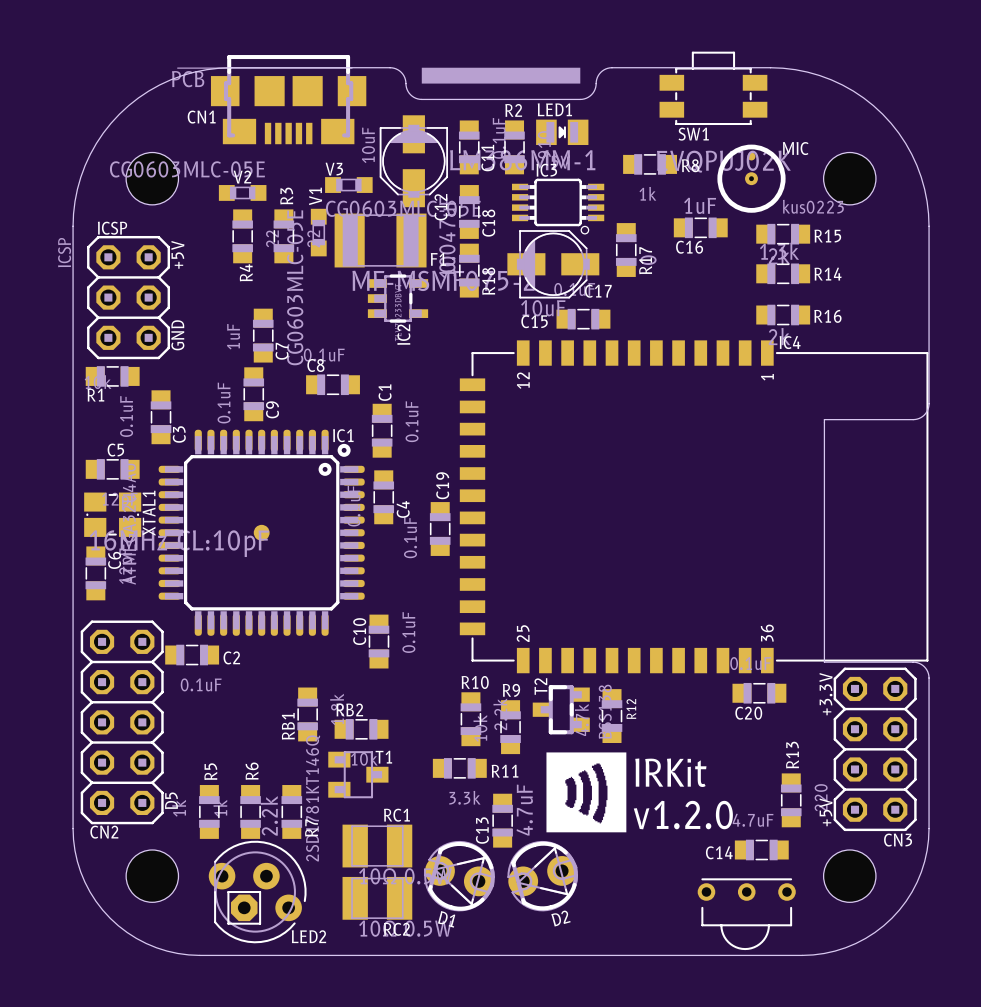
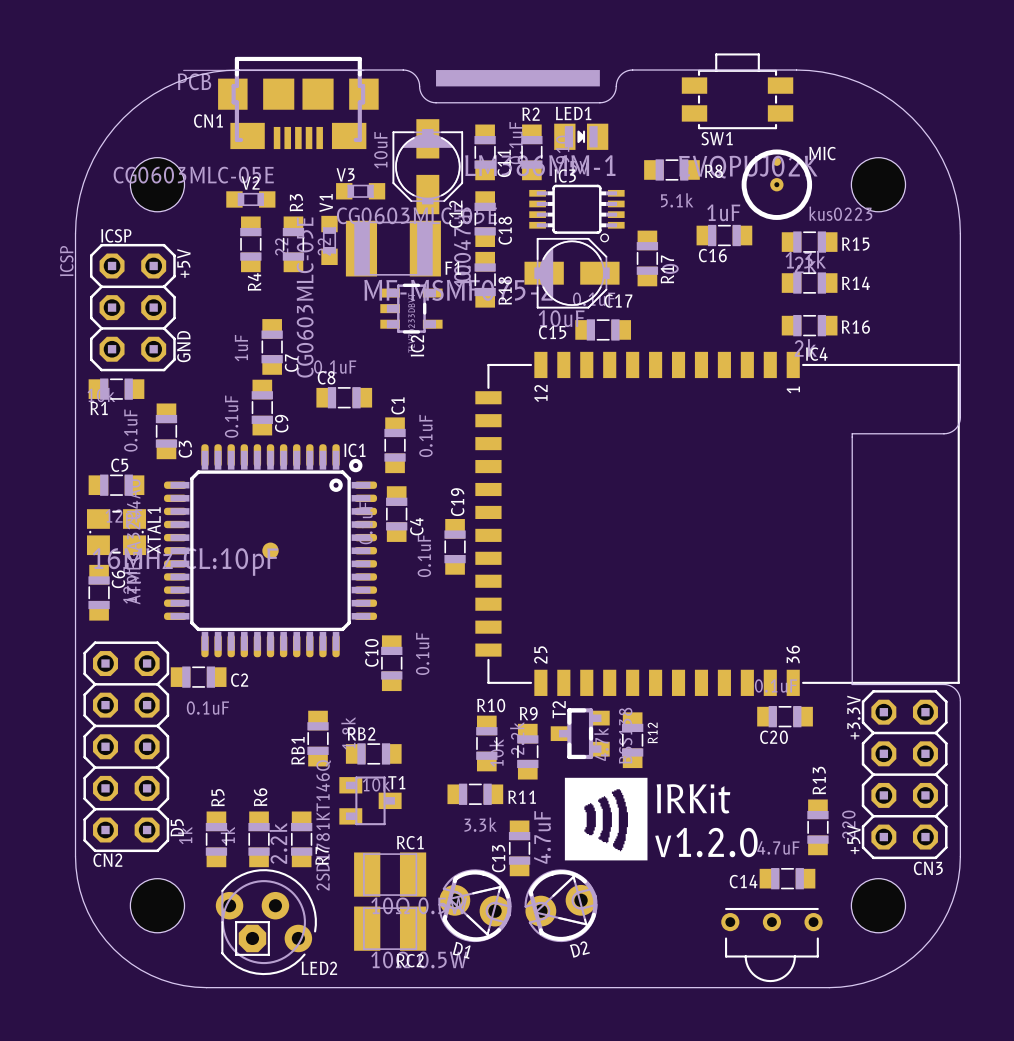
R8 value: 1k (647, 193) -> 5.1k (677, 200)

